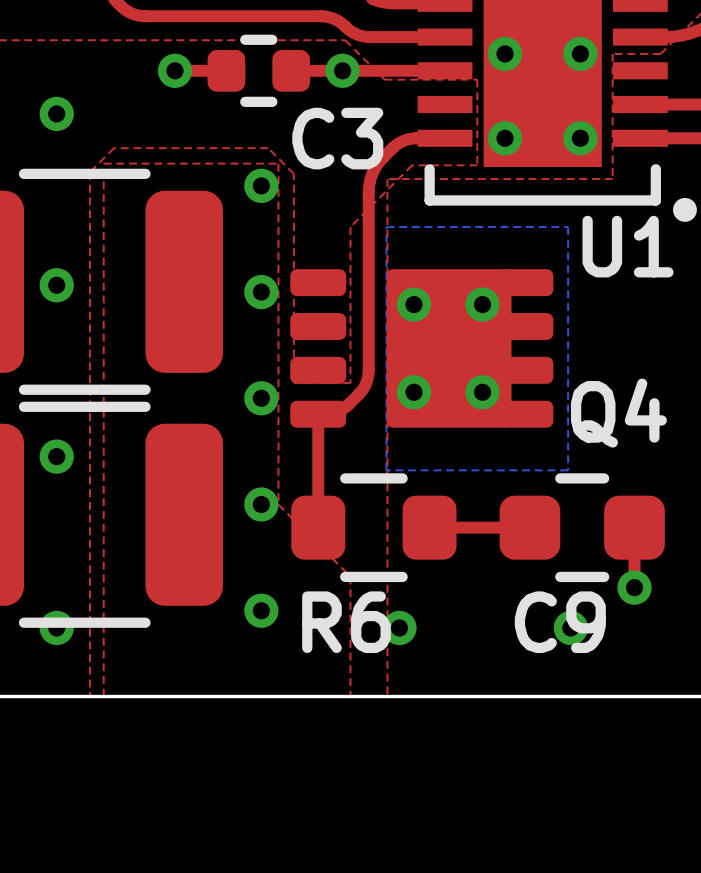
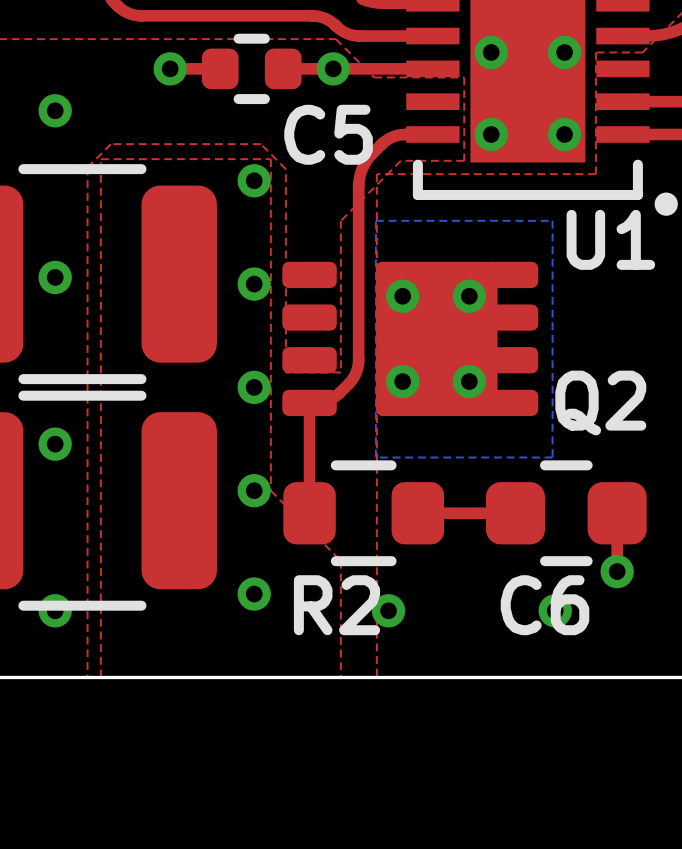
C3 name: C3 (337, 138) -> C5 (328, 134)
Q4 name: Q4 (618, 413) -> Q2 (600, 403)
R6 name: R6 (346, 622) -> R2 (336, 605)
C9 name: C9 (560, 622) -> C6 (544, 605)

